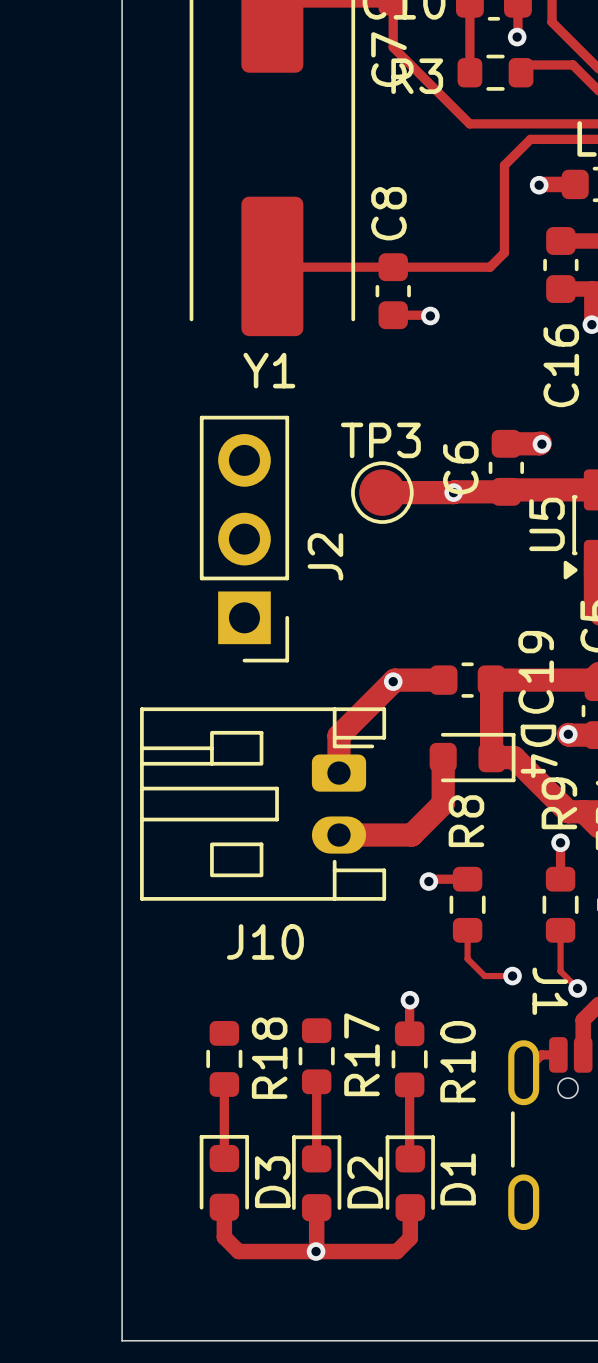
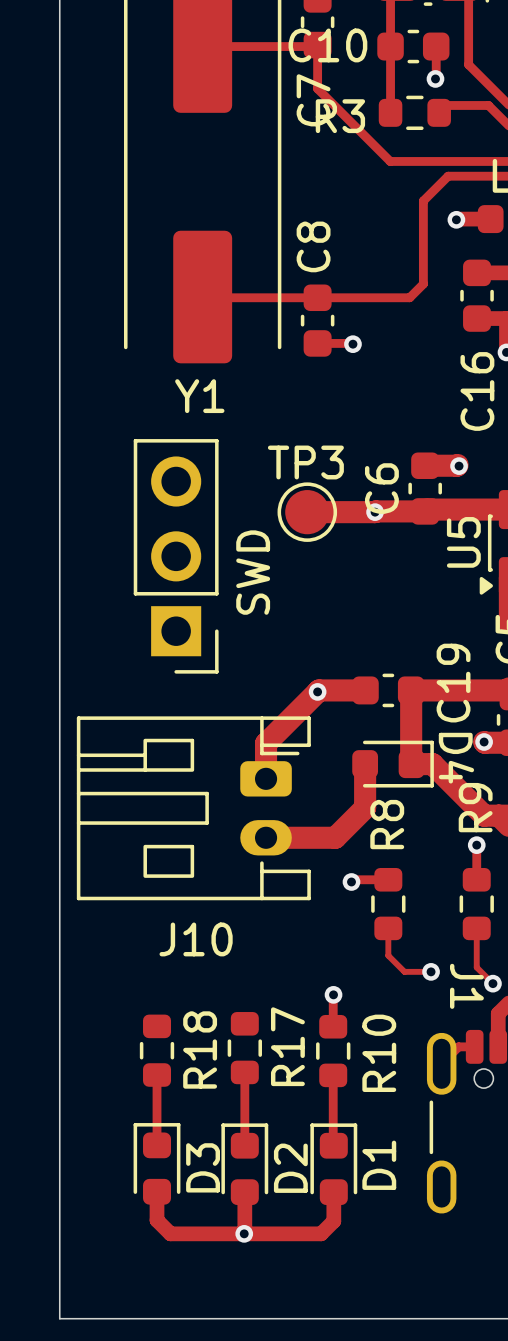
J2 name: J2 (325, 556) -> SWD (253, 572)

